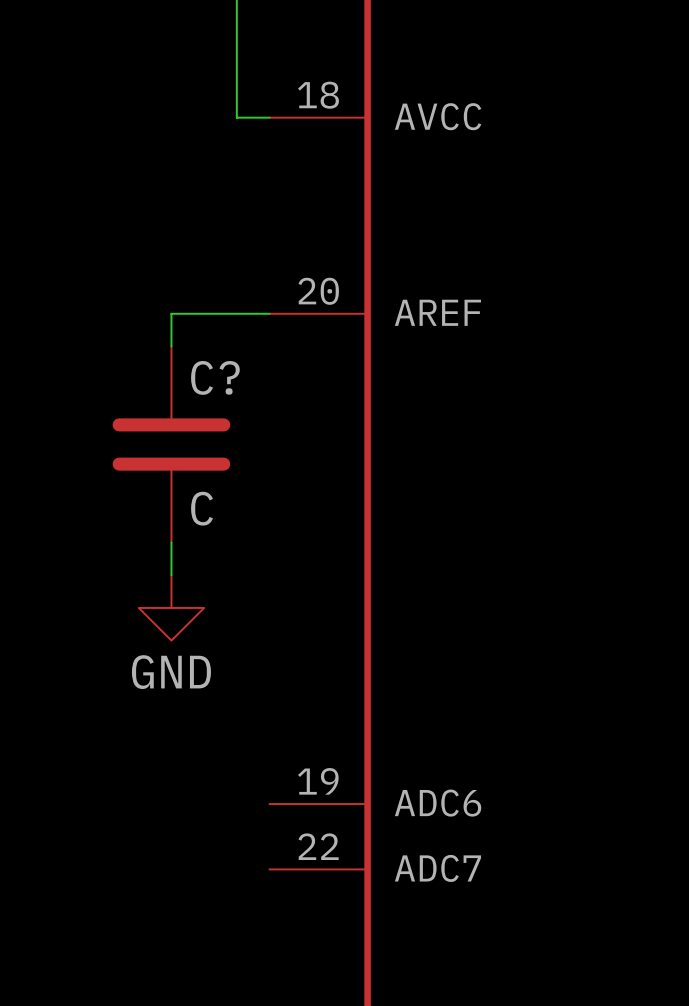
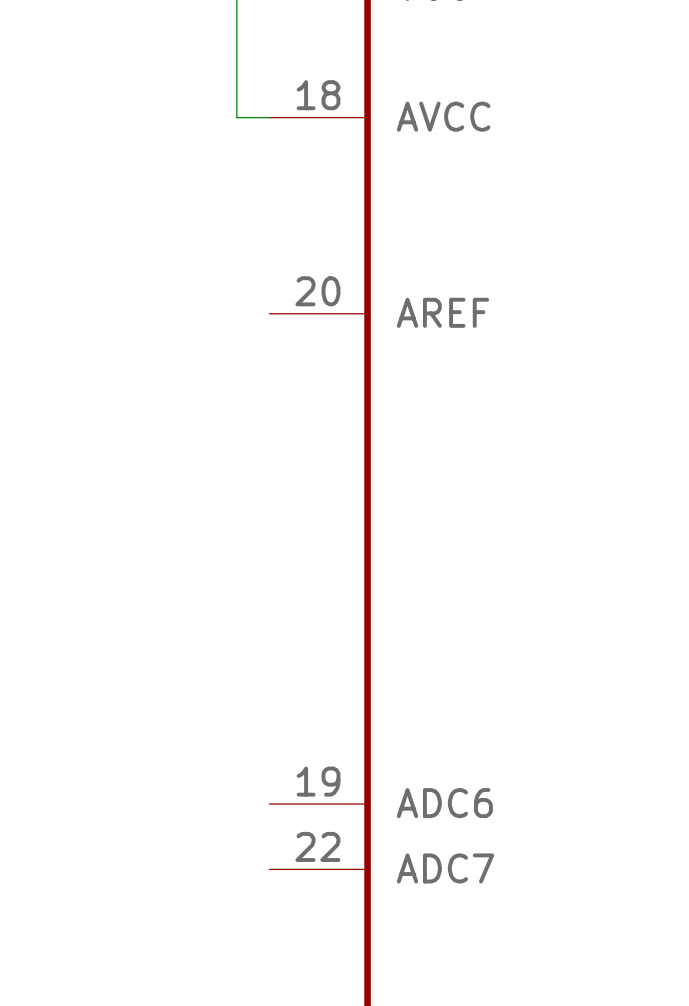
wire: (269, 313) (171, 313) (171, 346) -> none
C?: C (171, 444) -> none
wire: (171, 542) (171, 575) -> none
power symbol: GND (171, 607) -> none

